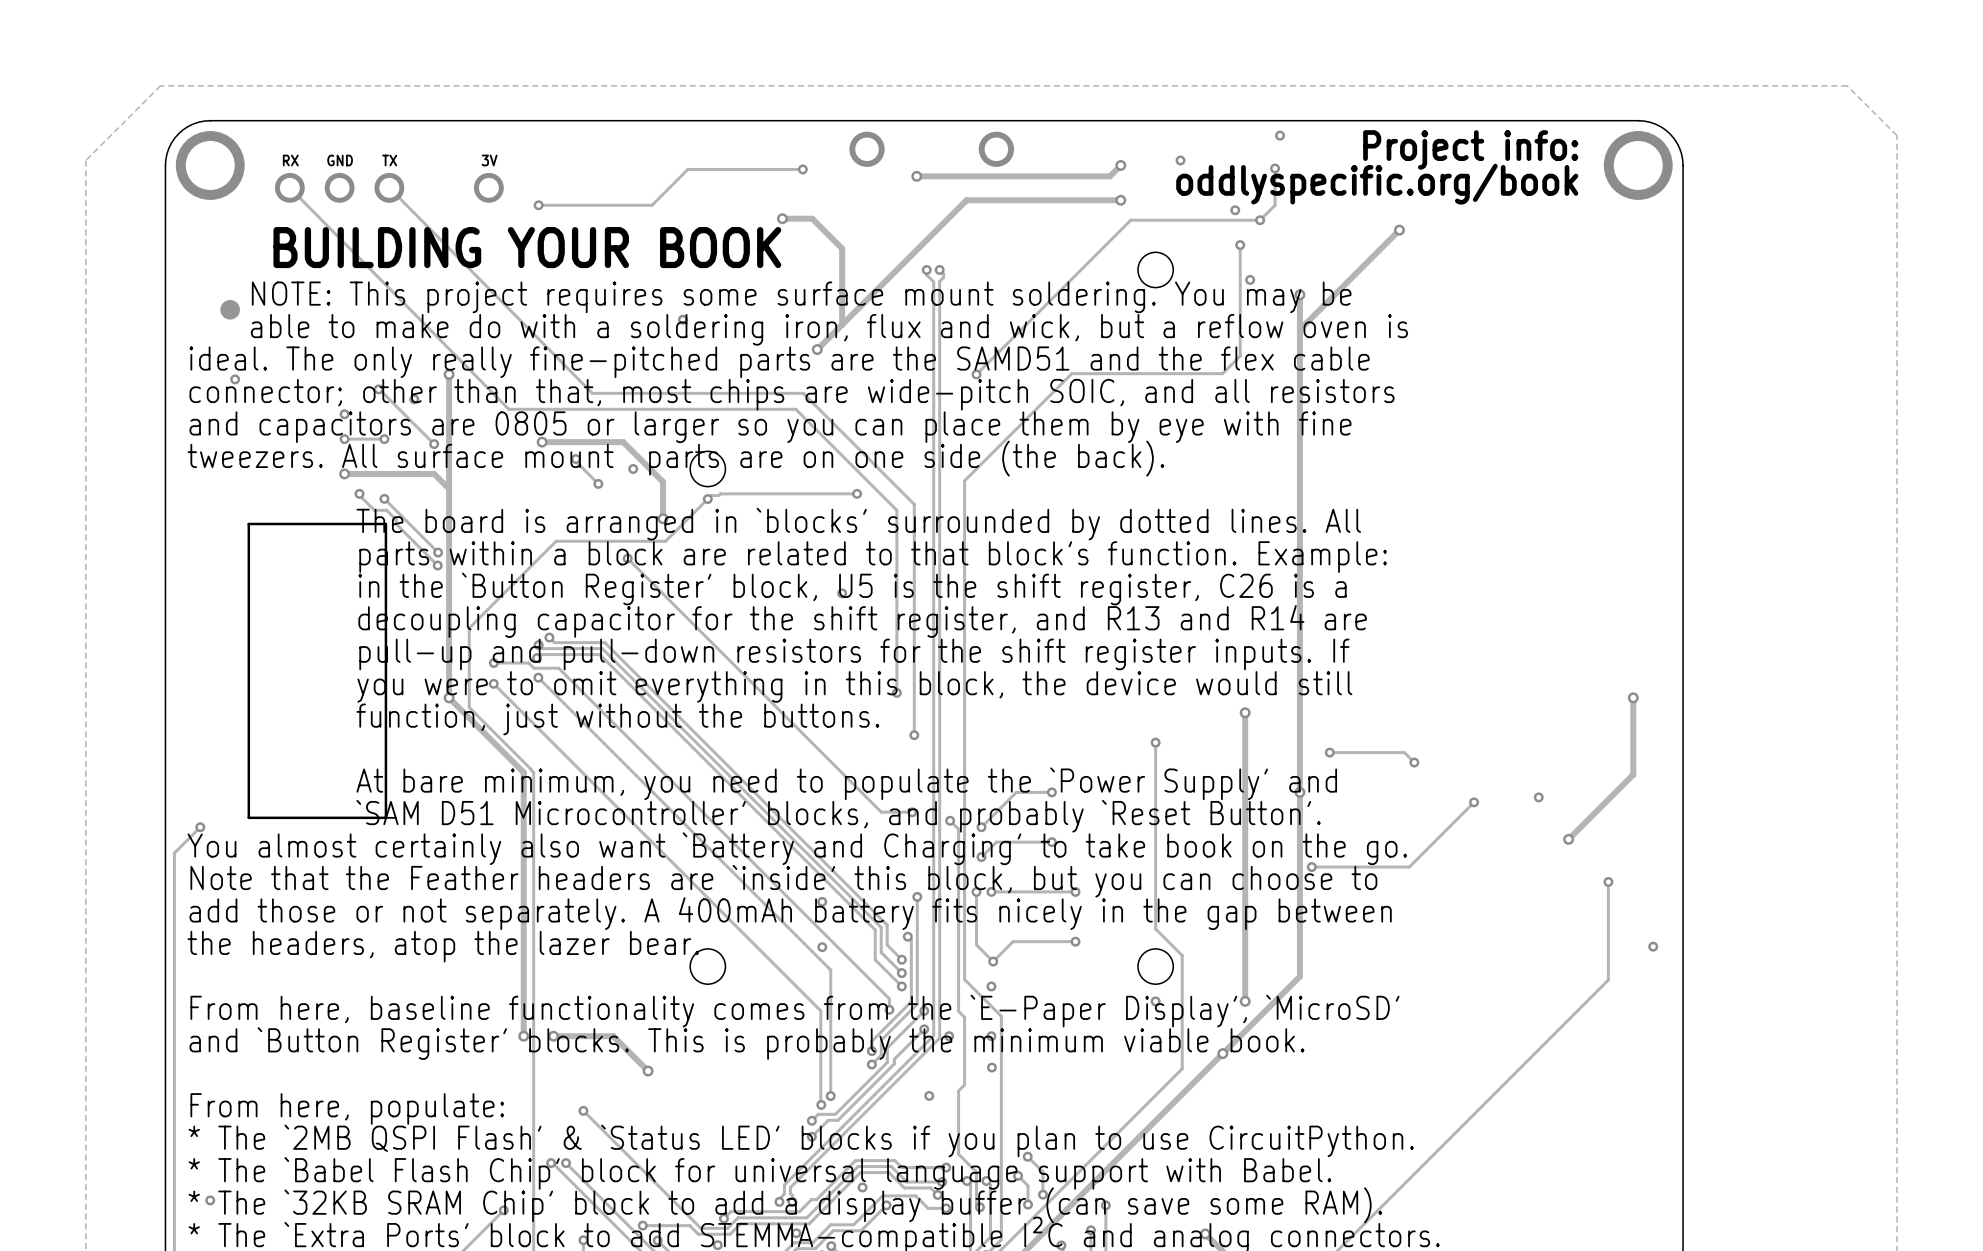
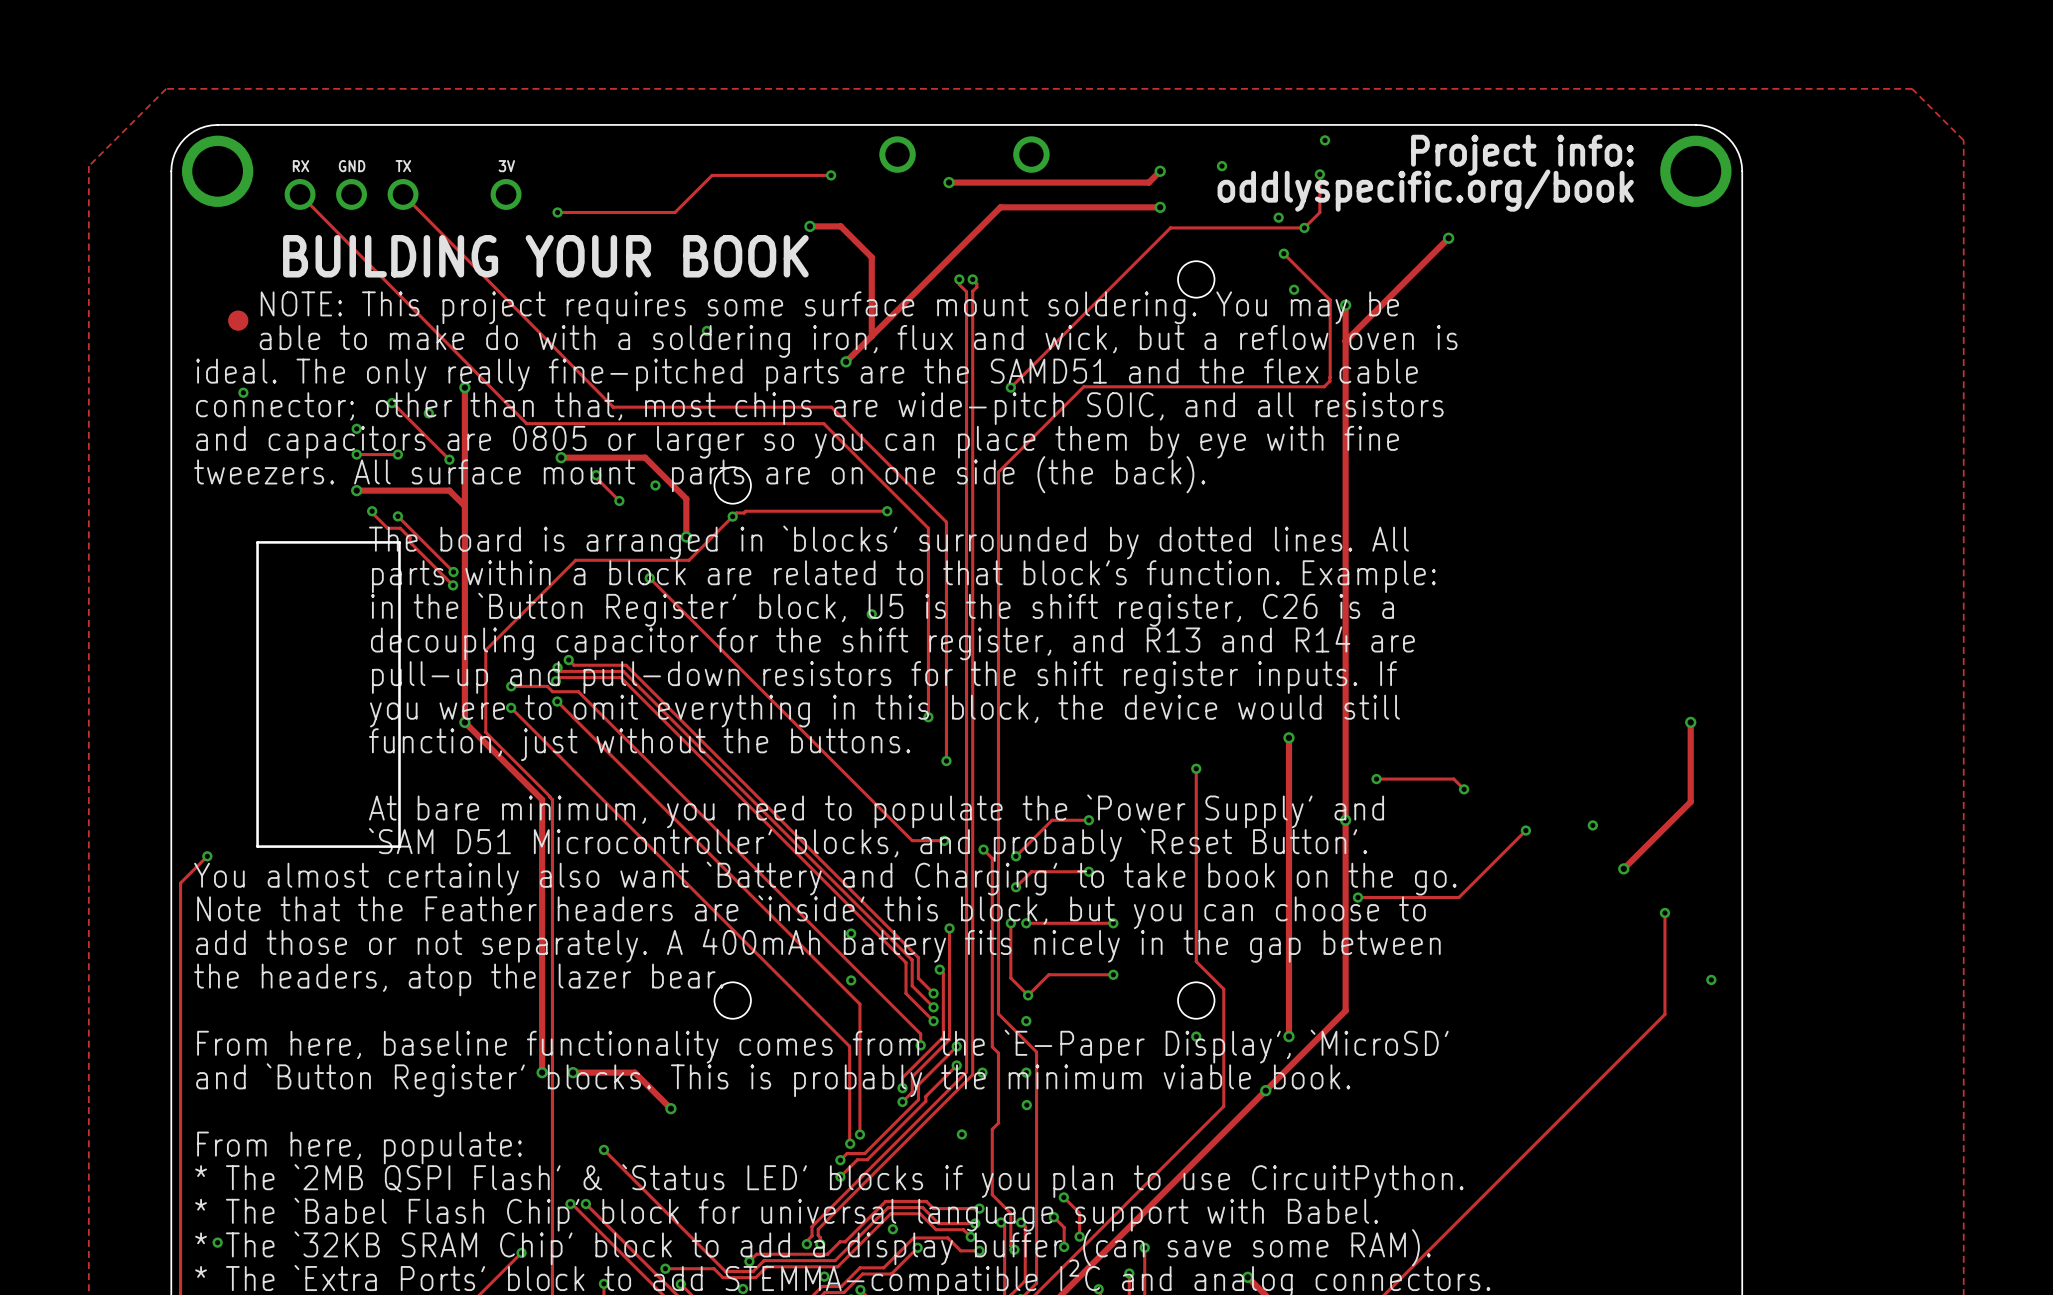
track: (1240, 245) (1240, 356) (1222, 373) -> (1283, 253) (1330, 300) (1330, 377)
track: none -> (1329, 377) (1329, 381) (1324, 386) (1265, 386)
track: (1071, 373) (964, 480) -> (1109, 386) (1083, 386) (998, 472) (998, 497)

